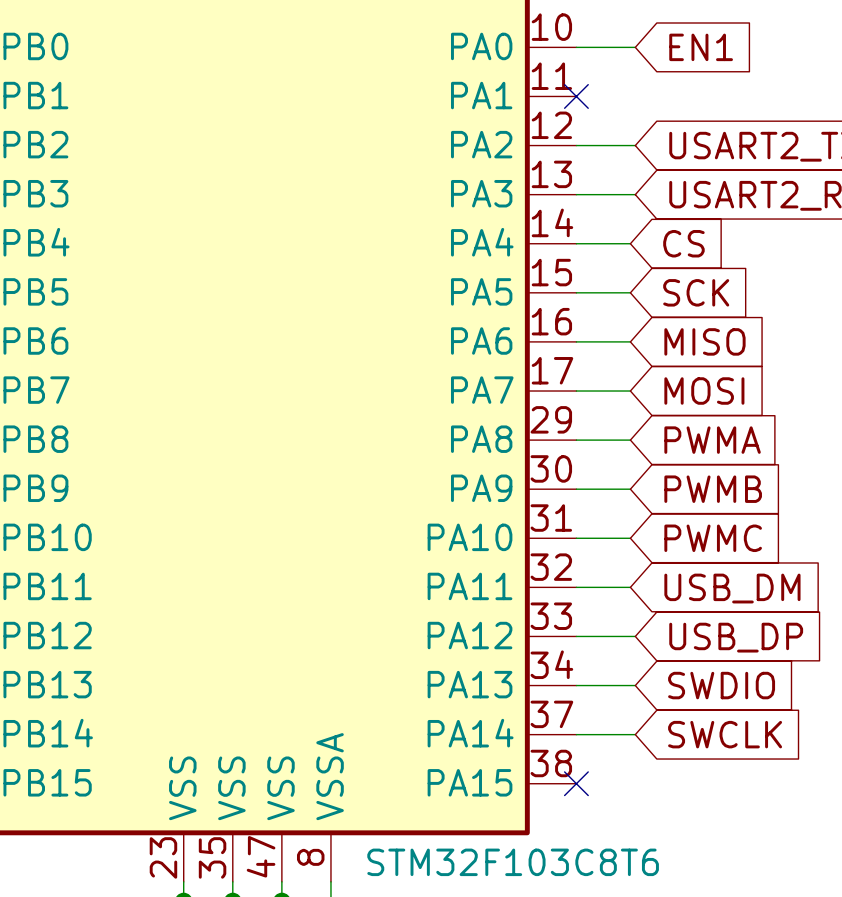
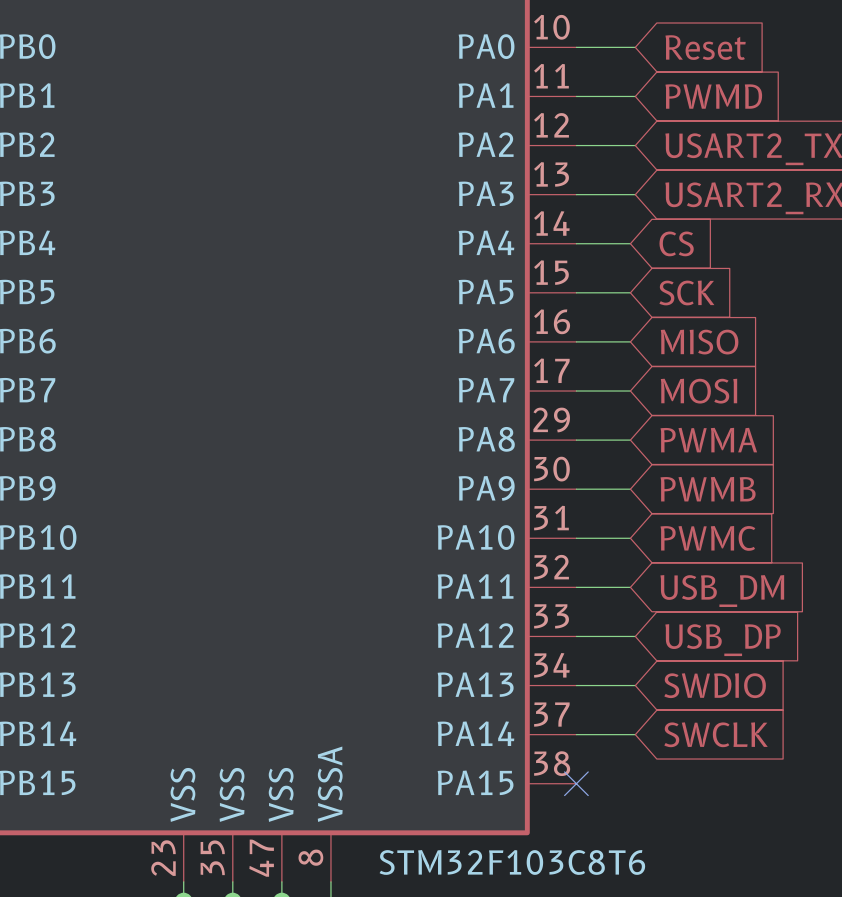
global label: EN1 (701, 47) -> Reset (705, 47)
wire: none -> (576, 96) (635, 96)
no-connect mark: (576, 96) -> none
global label: none -> PWMD (713, 96)

